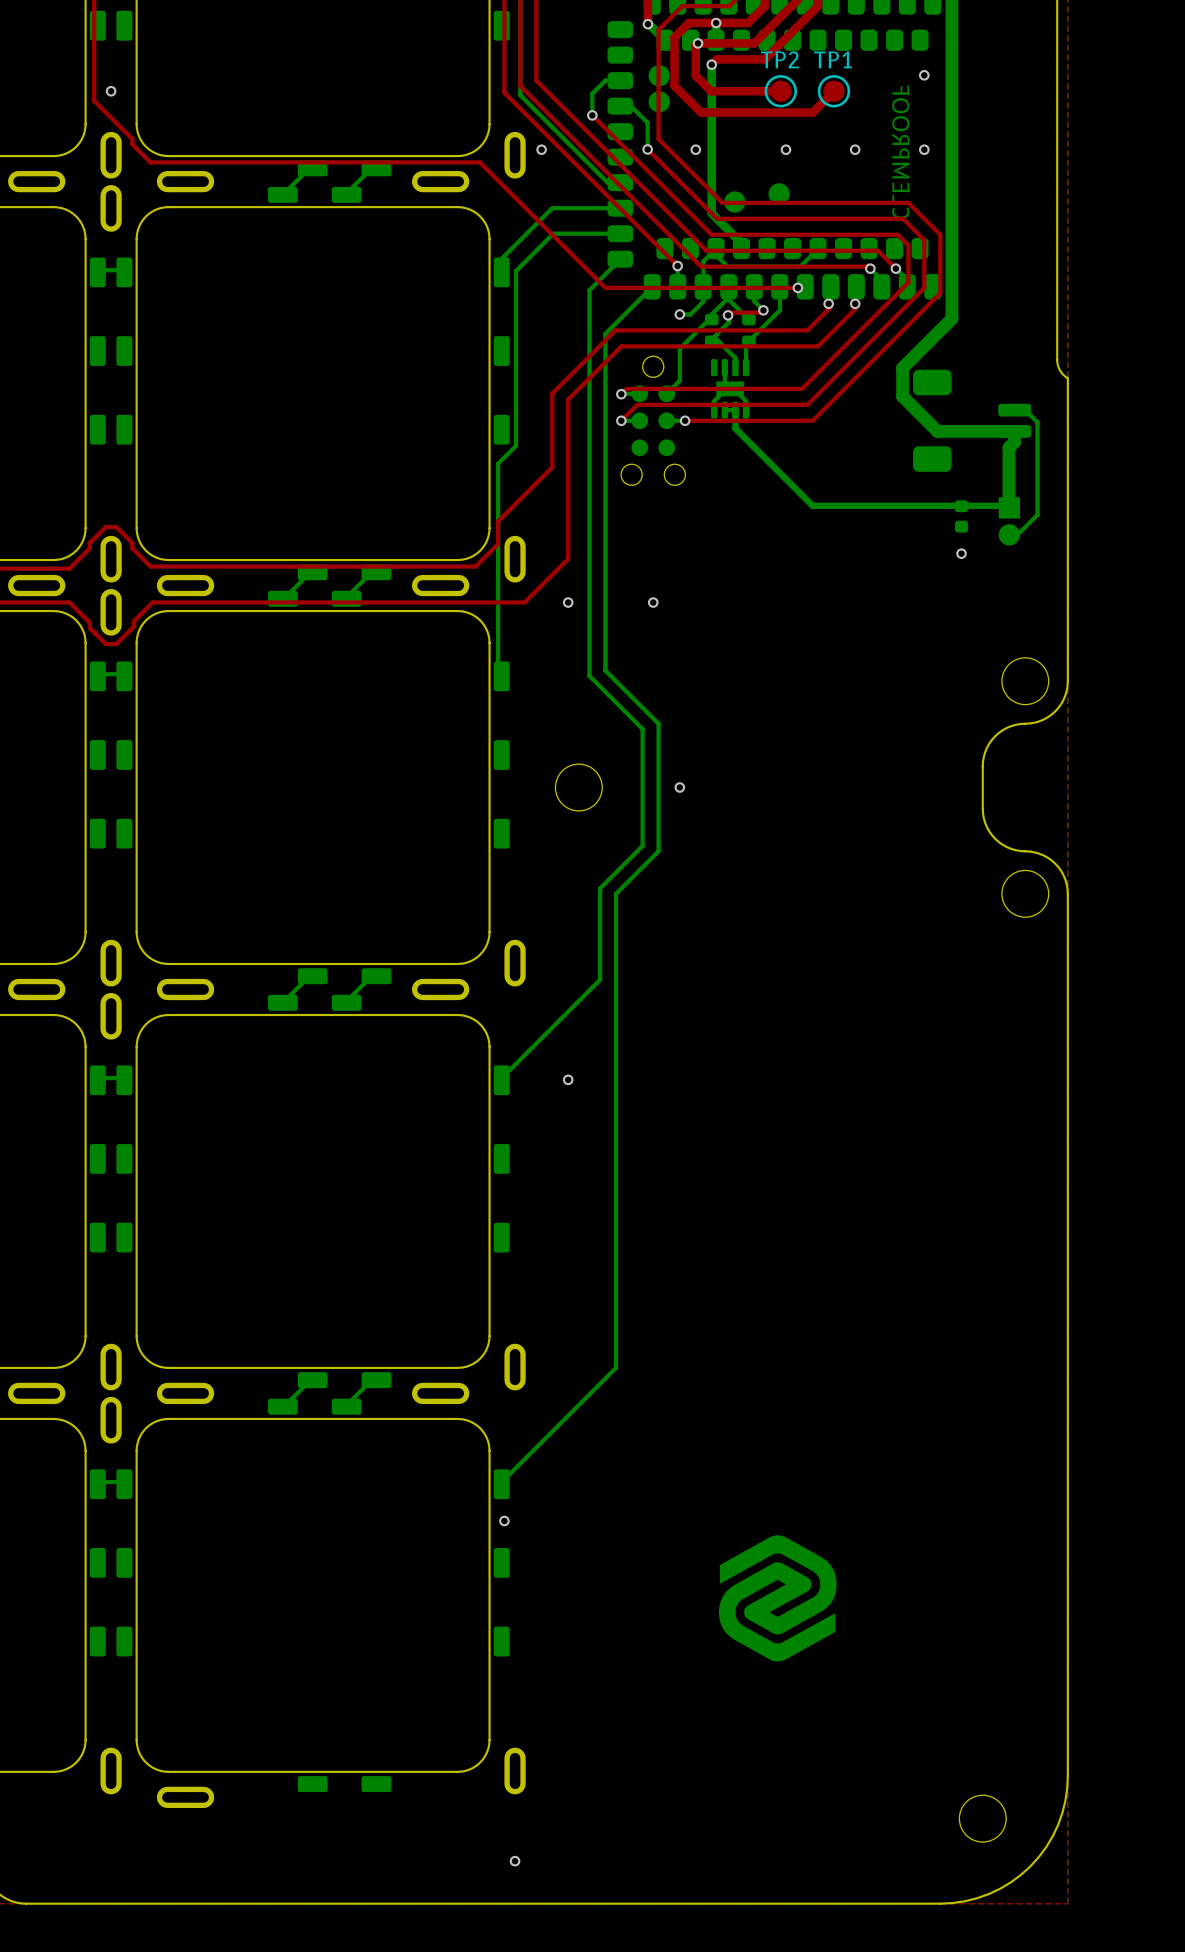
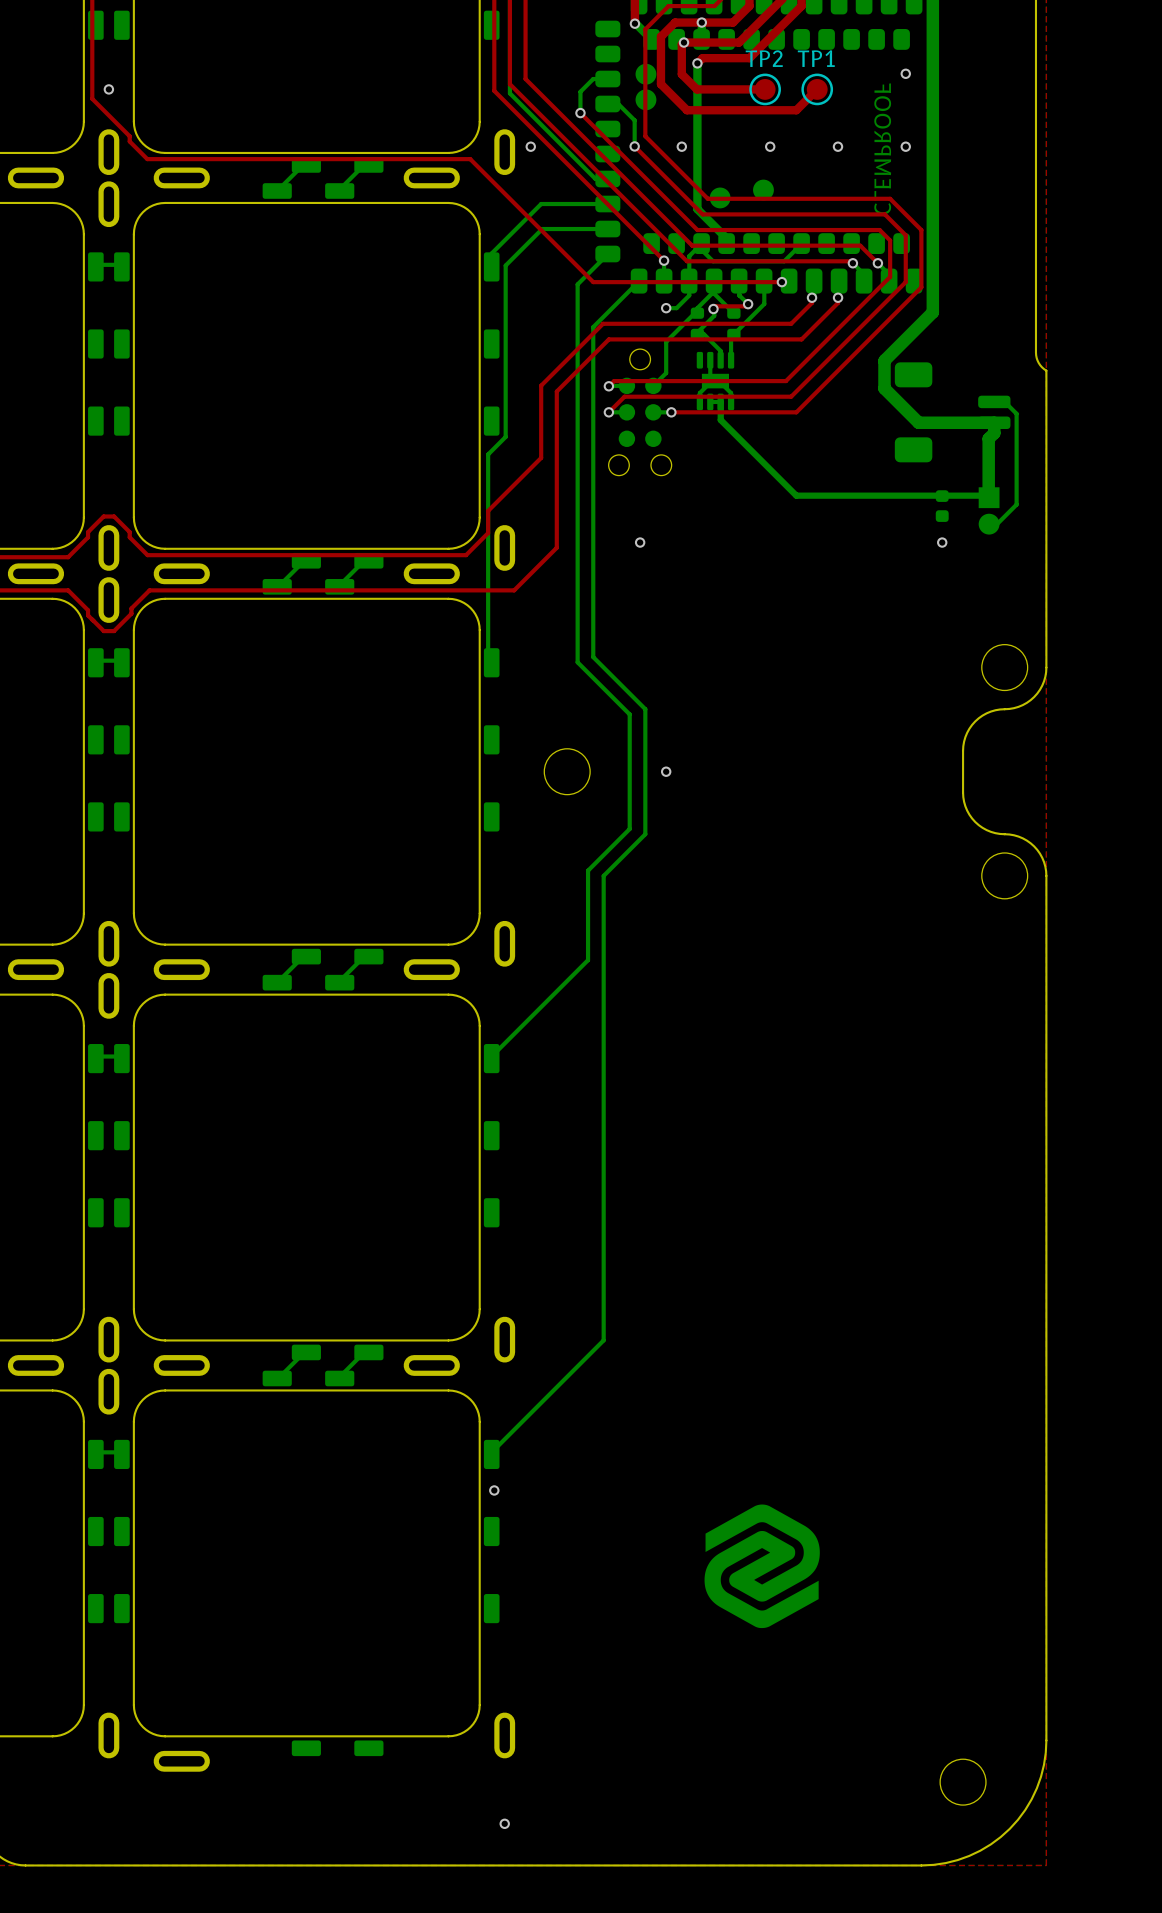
via: none -> (640, 542)
via: (568, 602) -> none
via: (653, 602) -> none
via: (568, 1079) -> none

